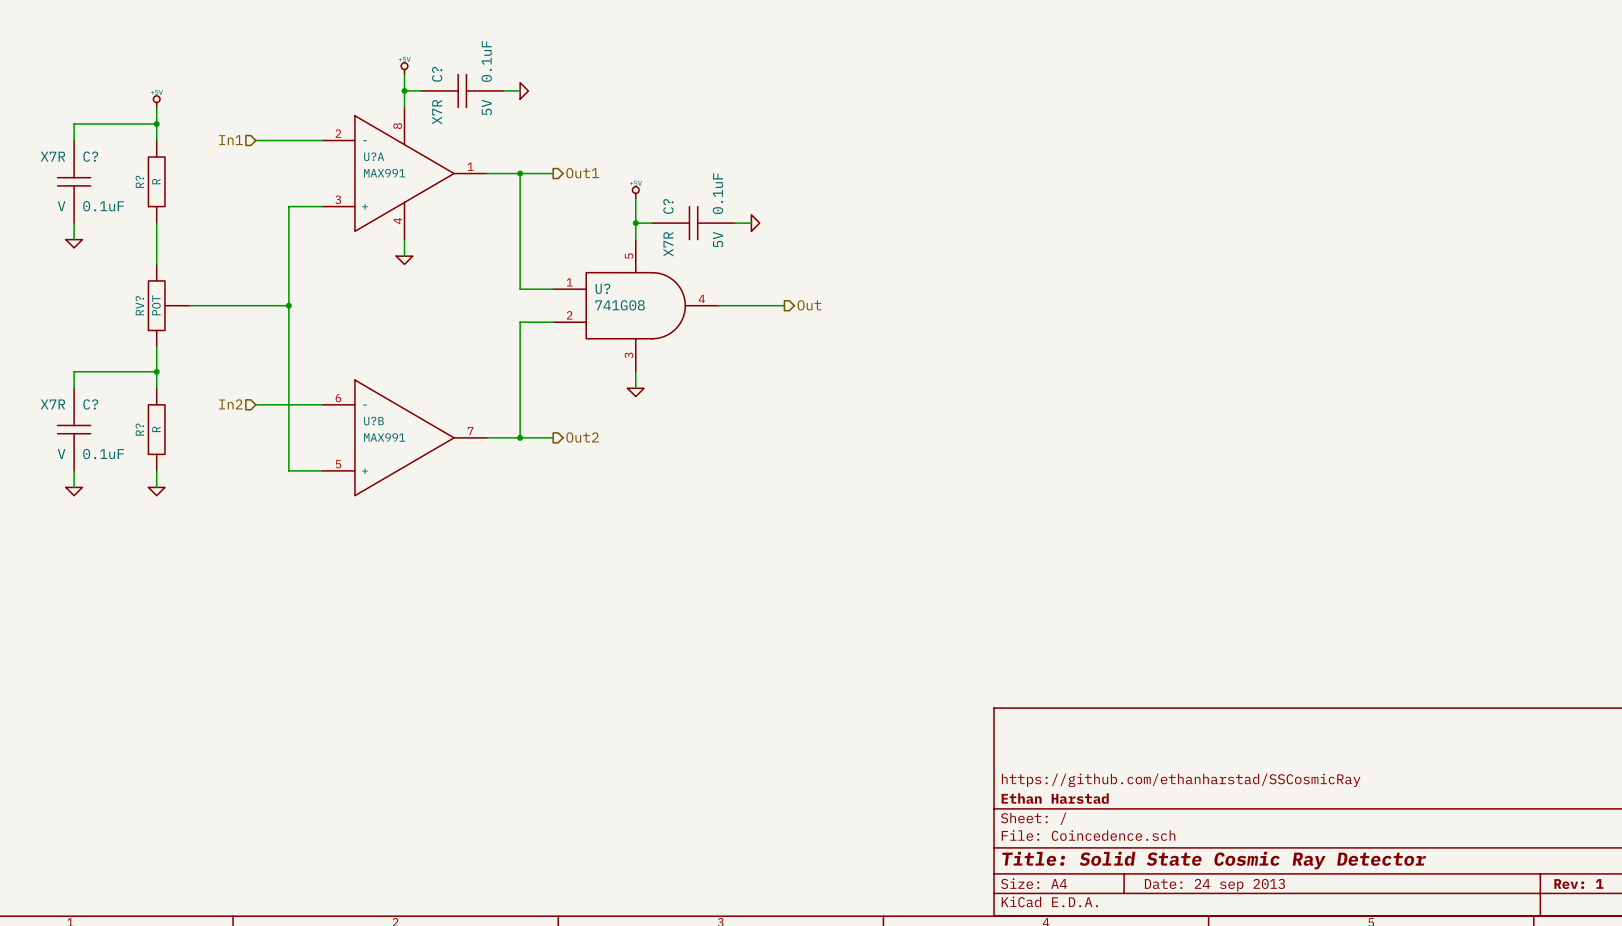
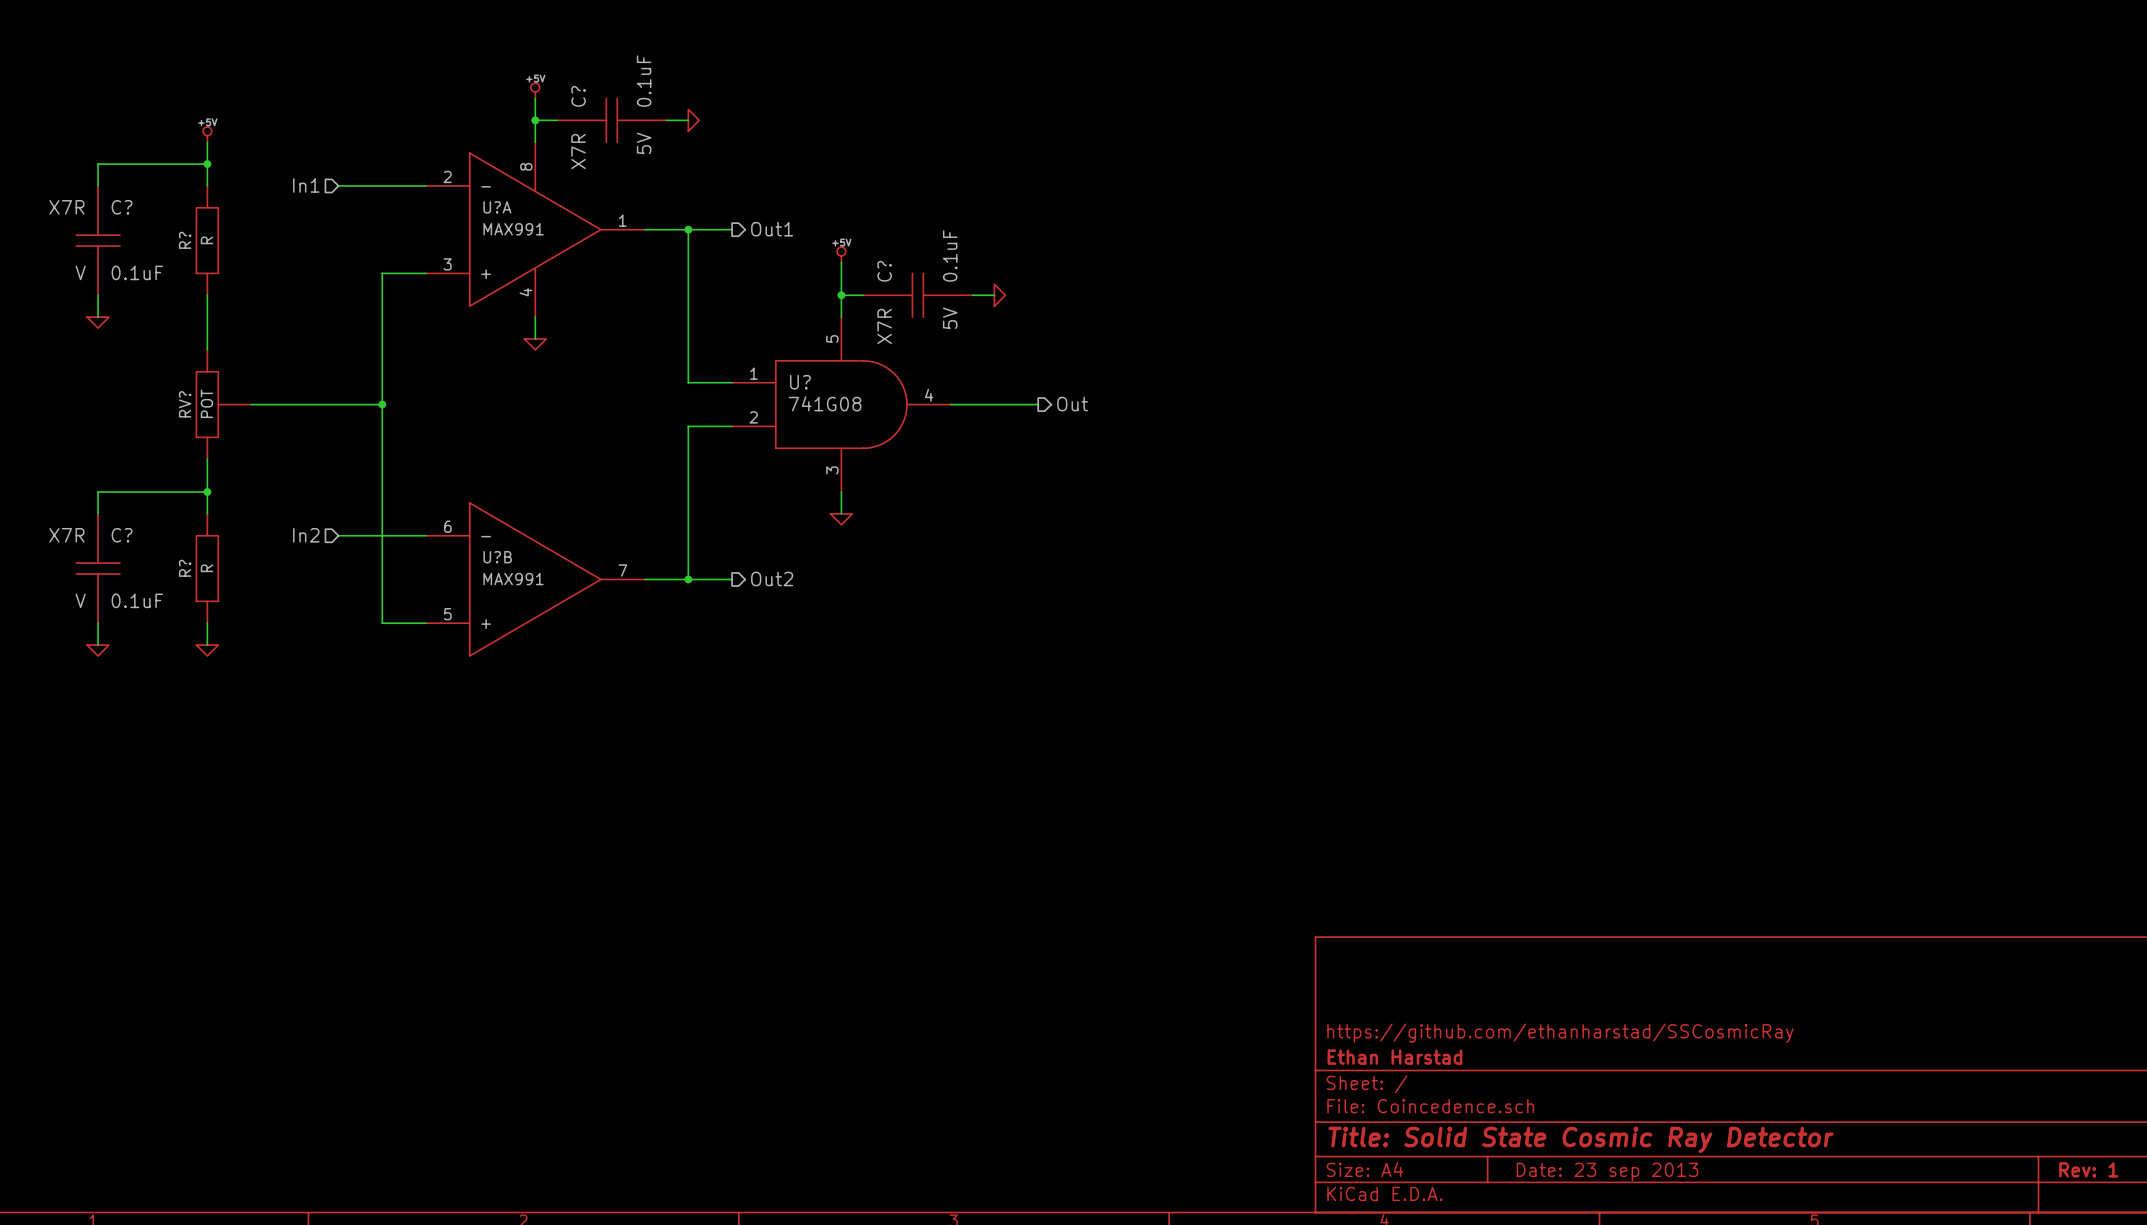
title block: Date: 24 sep 2013 (1214, 885) -> Date: 23 sep 2013 (1607, 1172)

